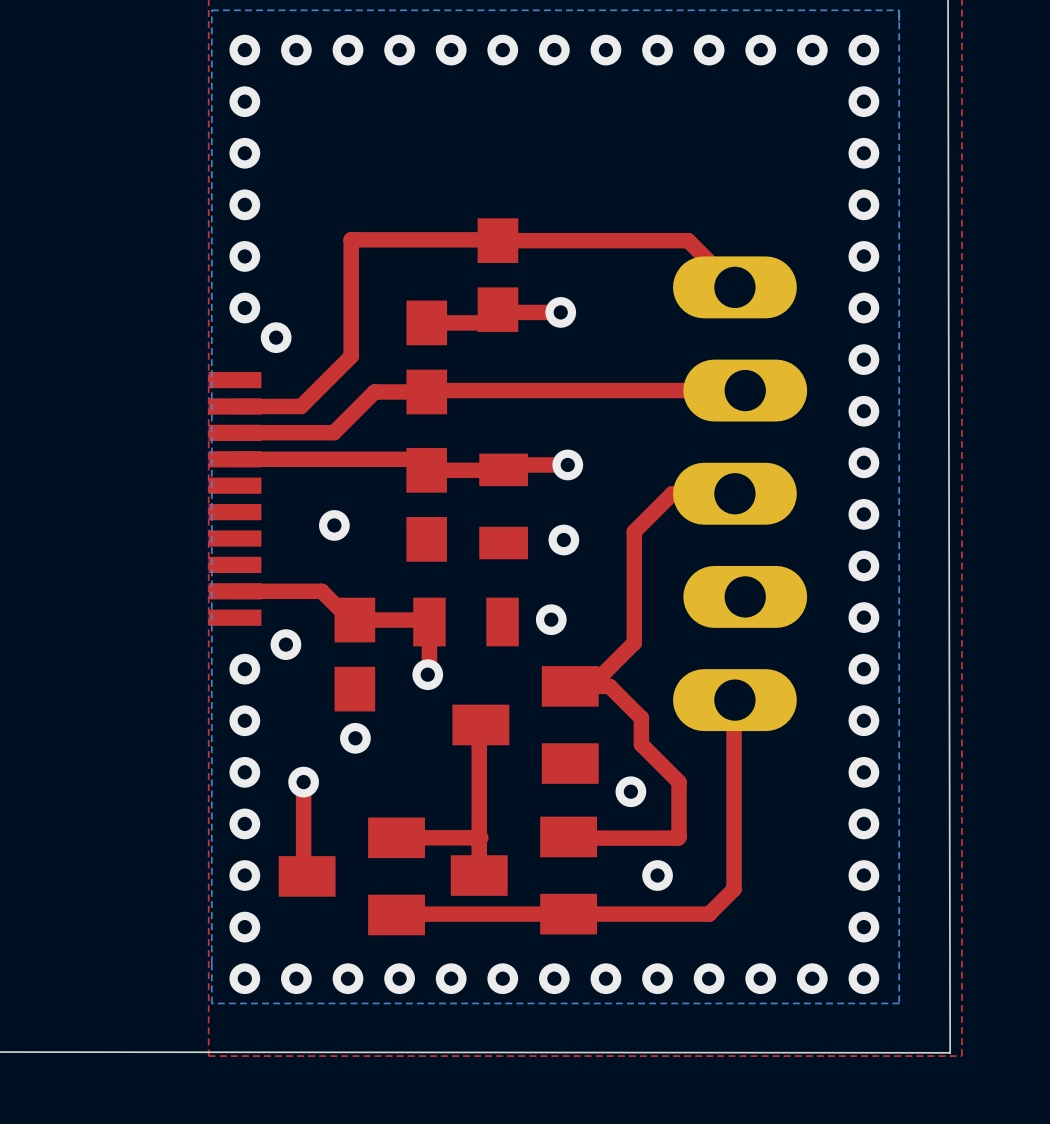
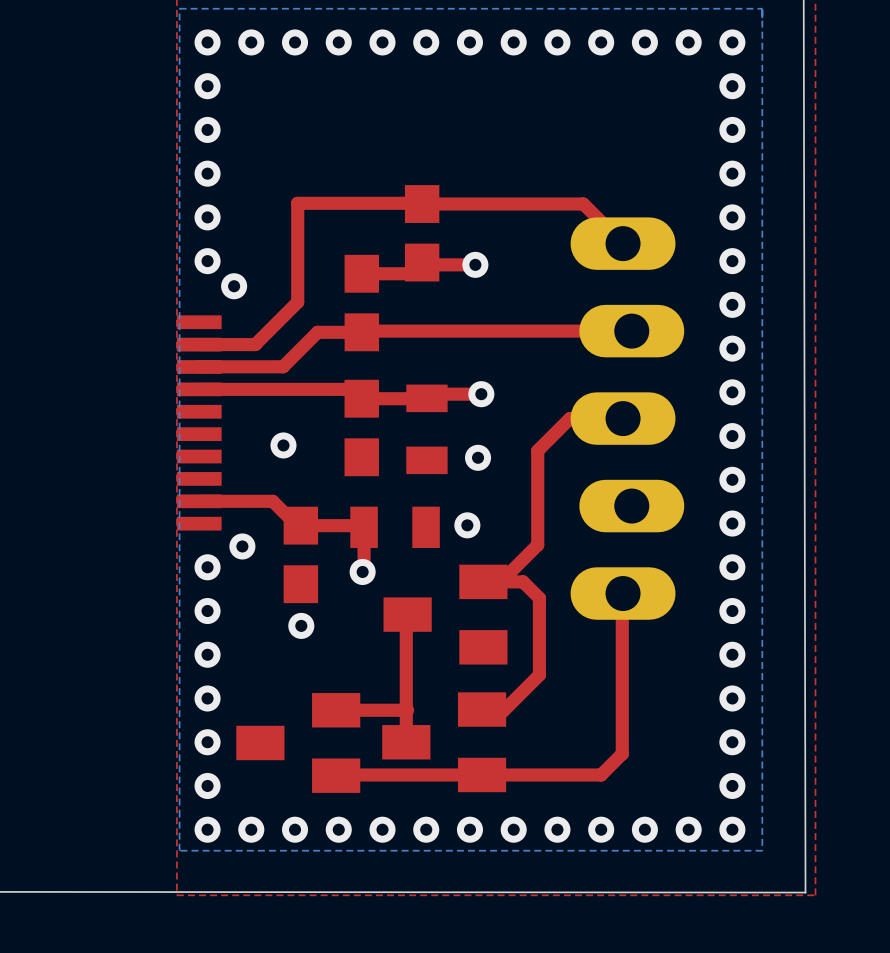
top track: (609, 686) (641, 718) (641, 744) (679, 782) (679, 837) (568, 836) -> (516, 581) (523, 581) (539, 598) (539, 675) (499, 715)
top track: (303, 782) (303, 872) (307, 876) -> none
via: (303, 782) -> none
via: (630, 791) -> none
via: (657, 875) -> none

